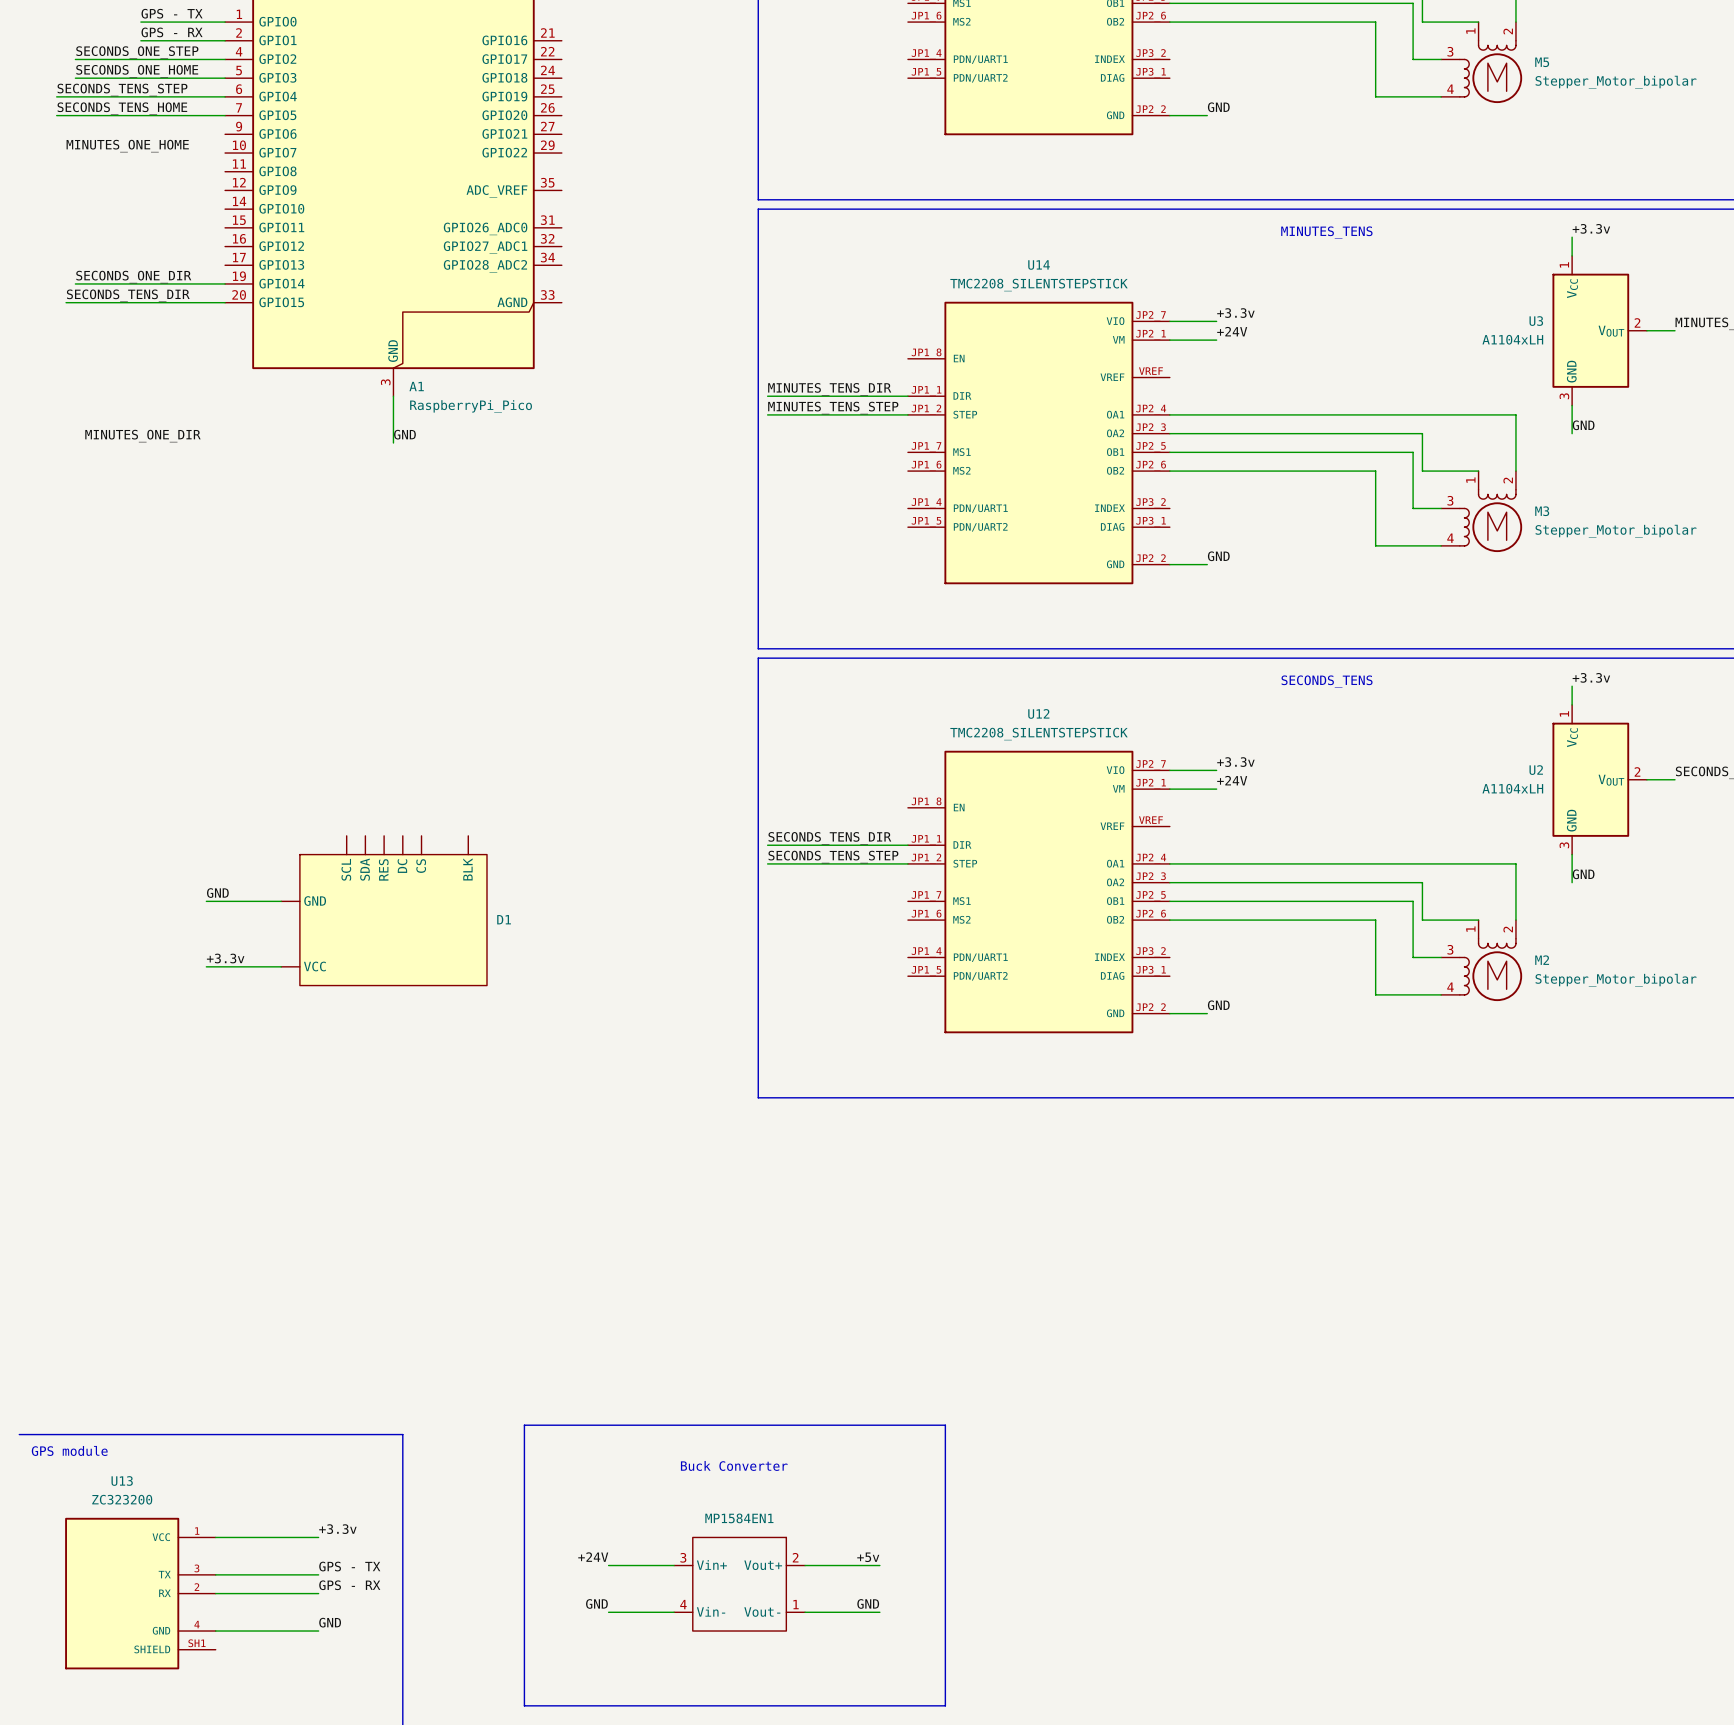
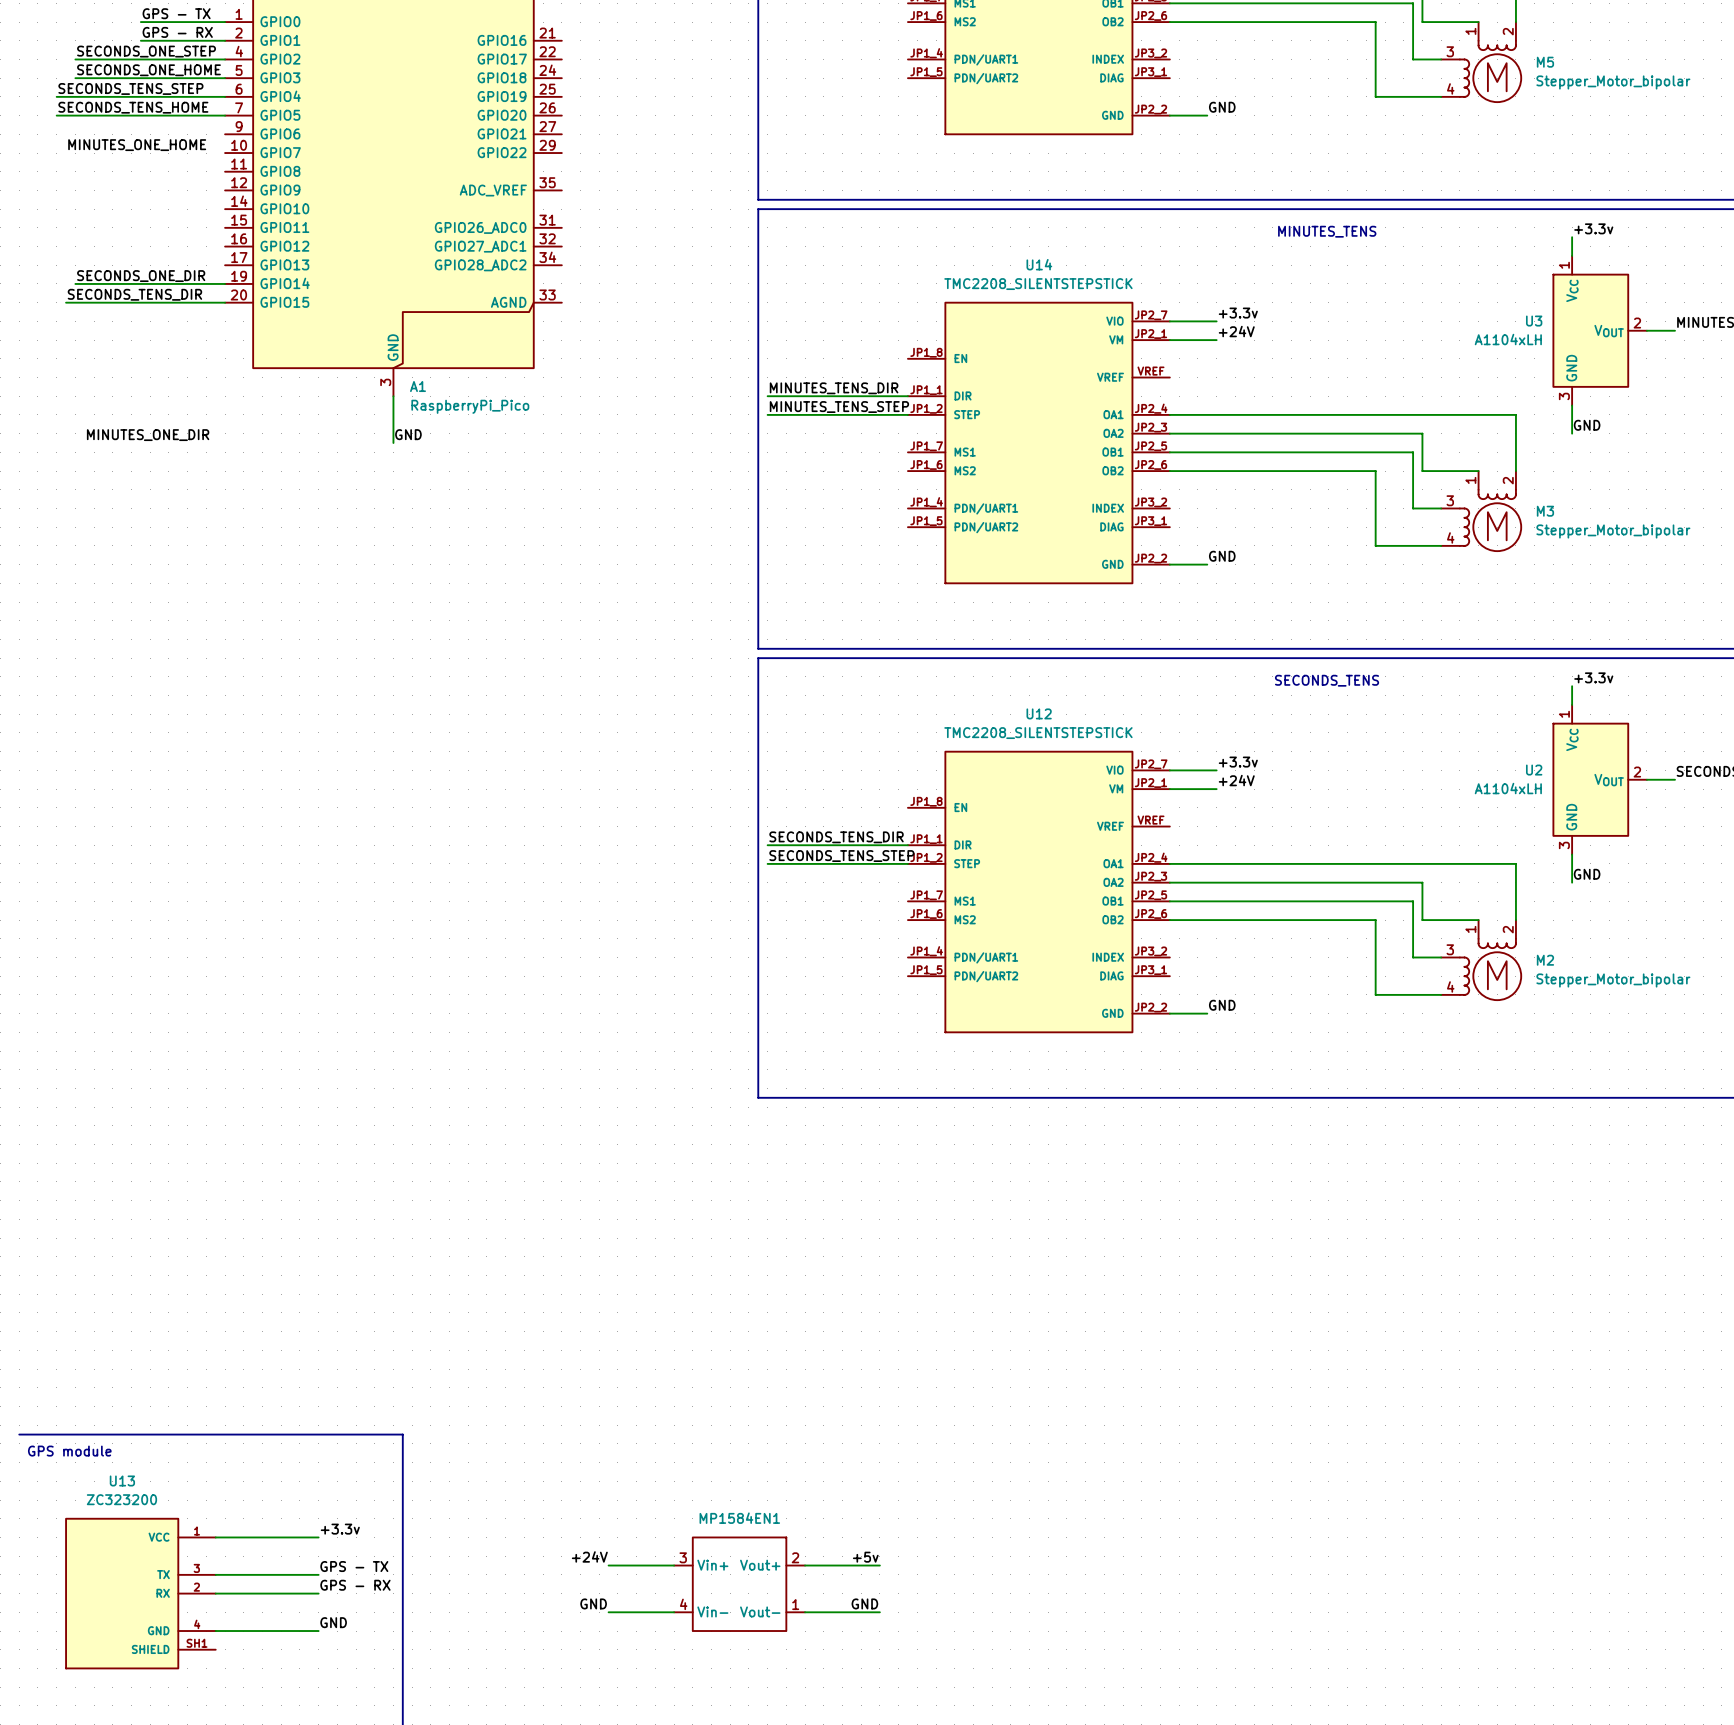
label: GND (217, 893) -> none
wire: (206, 901) (281, 901) -> none
D1: (384, 910) -> none
label: +3.3v (225, 958) -> none
wire: (206, 966) (281, 966) -> none
line: (524, 1425) (945, 1425) (945, 1705) (524, 1705) (524, 1425) -> none
text: Buck Converter (734, 1465) -> none

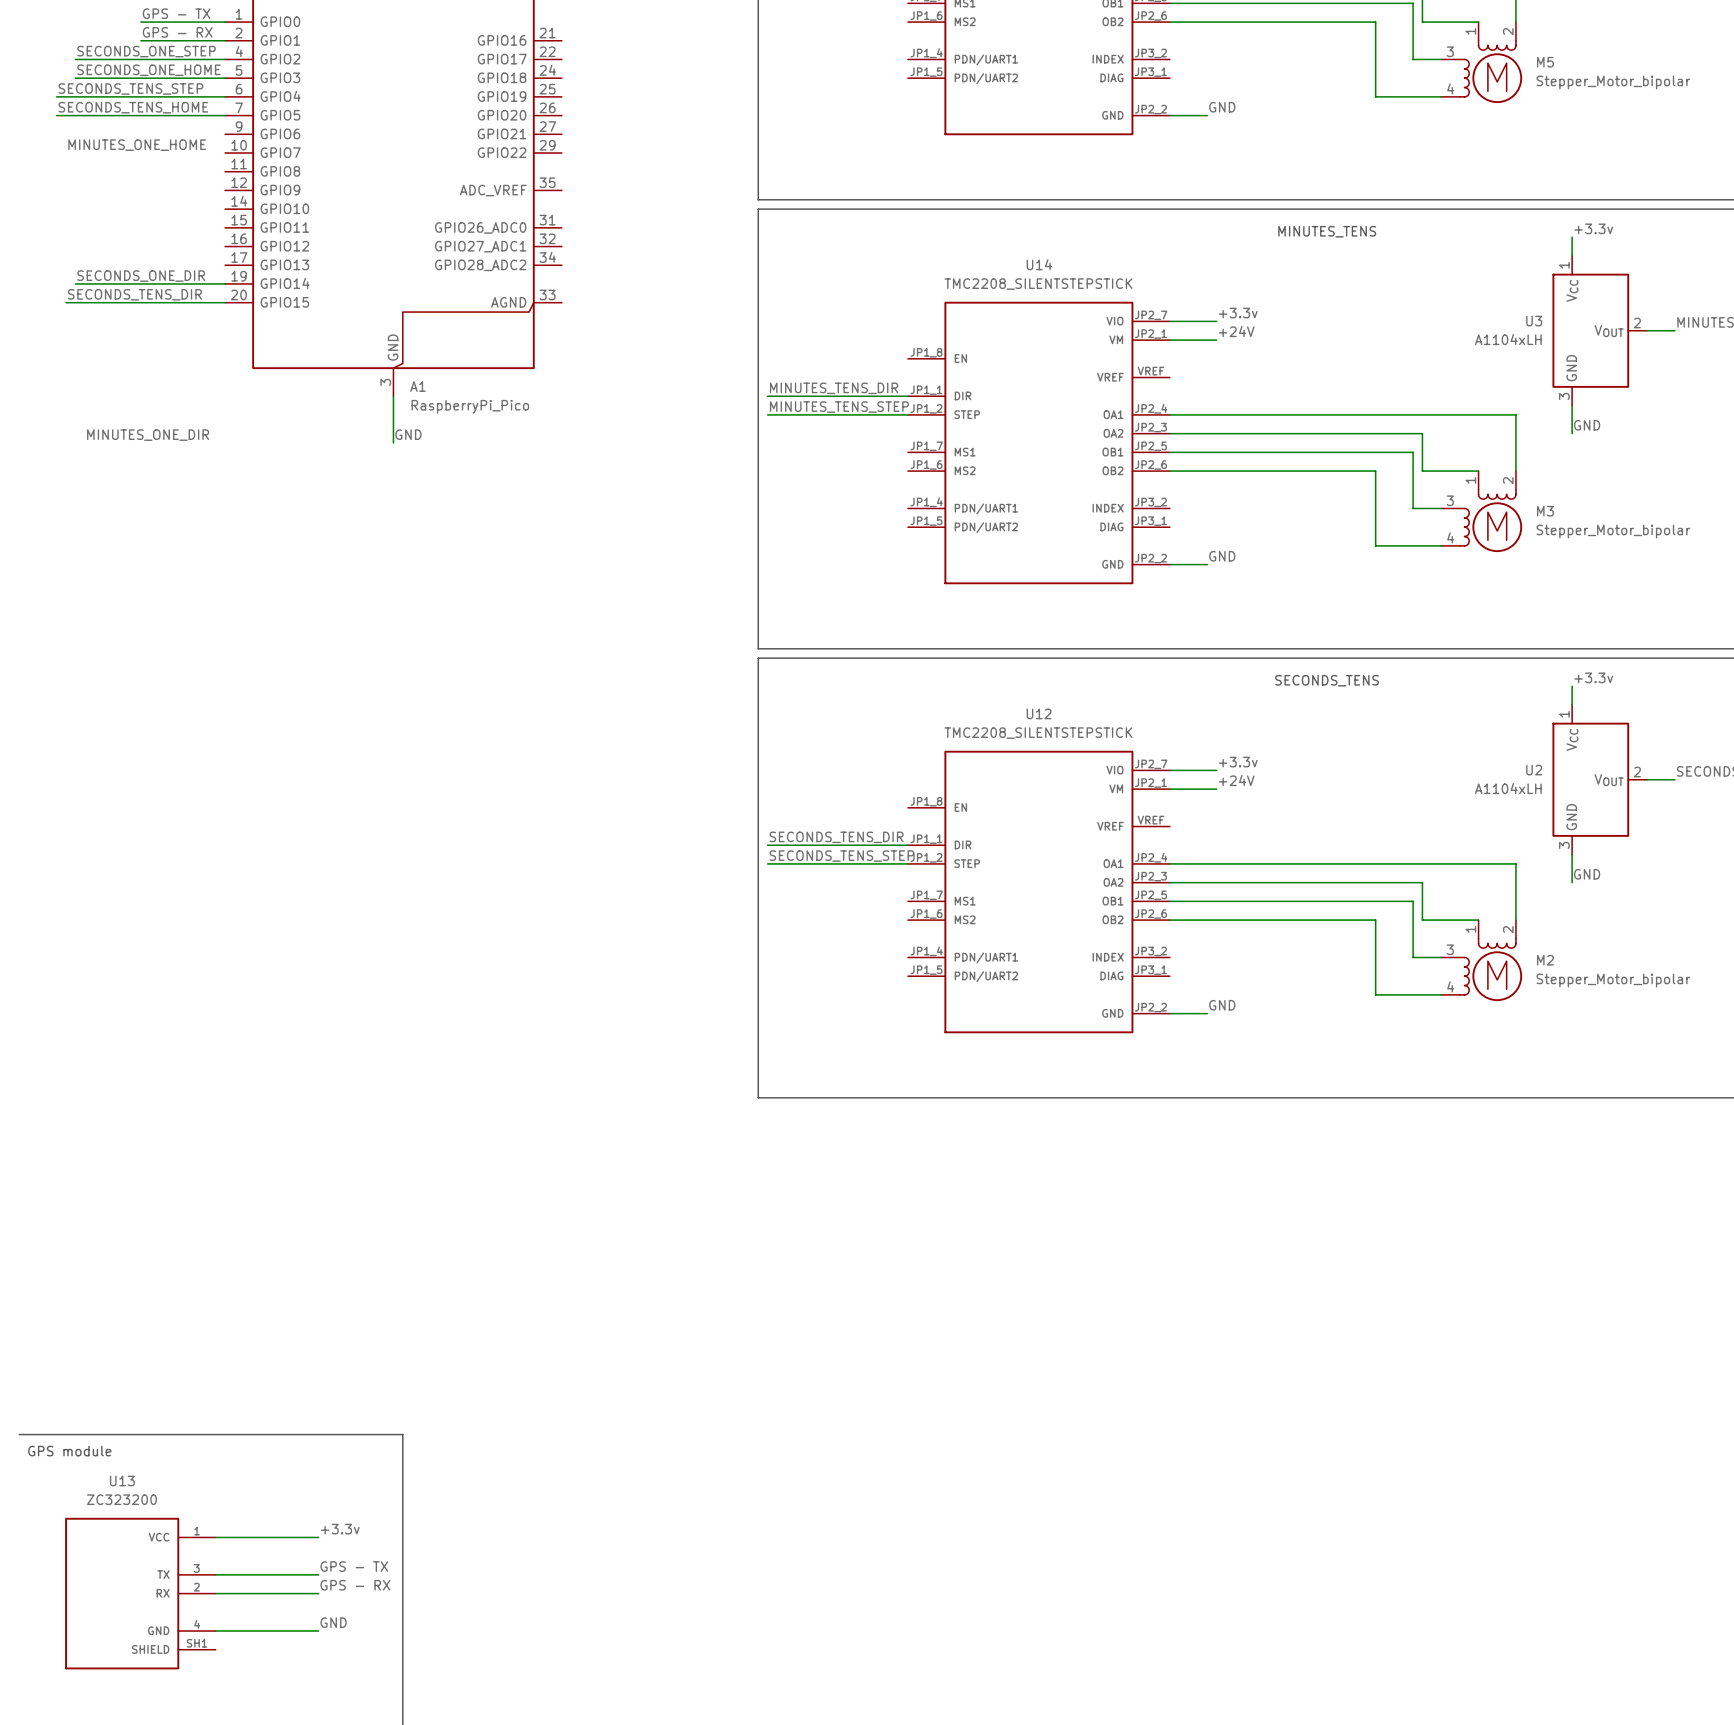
label: +24V (589, 1556) -> none
label: +5v (865, 1557) -> none
wire: (608, 1565) (674, 1565) -> none
wire: (805, 1565) (879, 1565) -> none
MP1584EN1: (739, 1584) -> none
label: GND (593, 1603) -> none
label: GND (864, 1603) -> none
wire: (608, 1612) (674, 1612) -> none
wire: (805, 1612) (879, 1612) -> none

